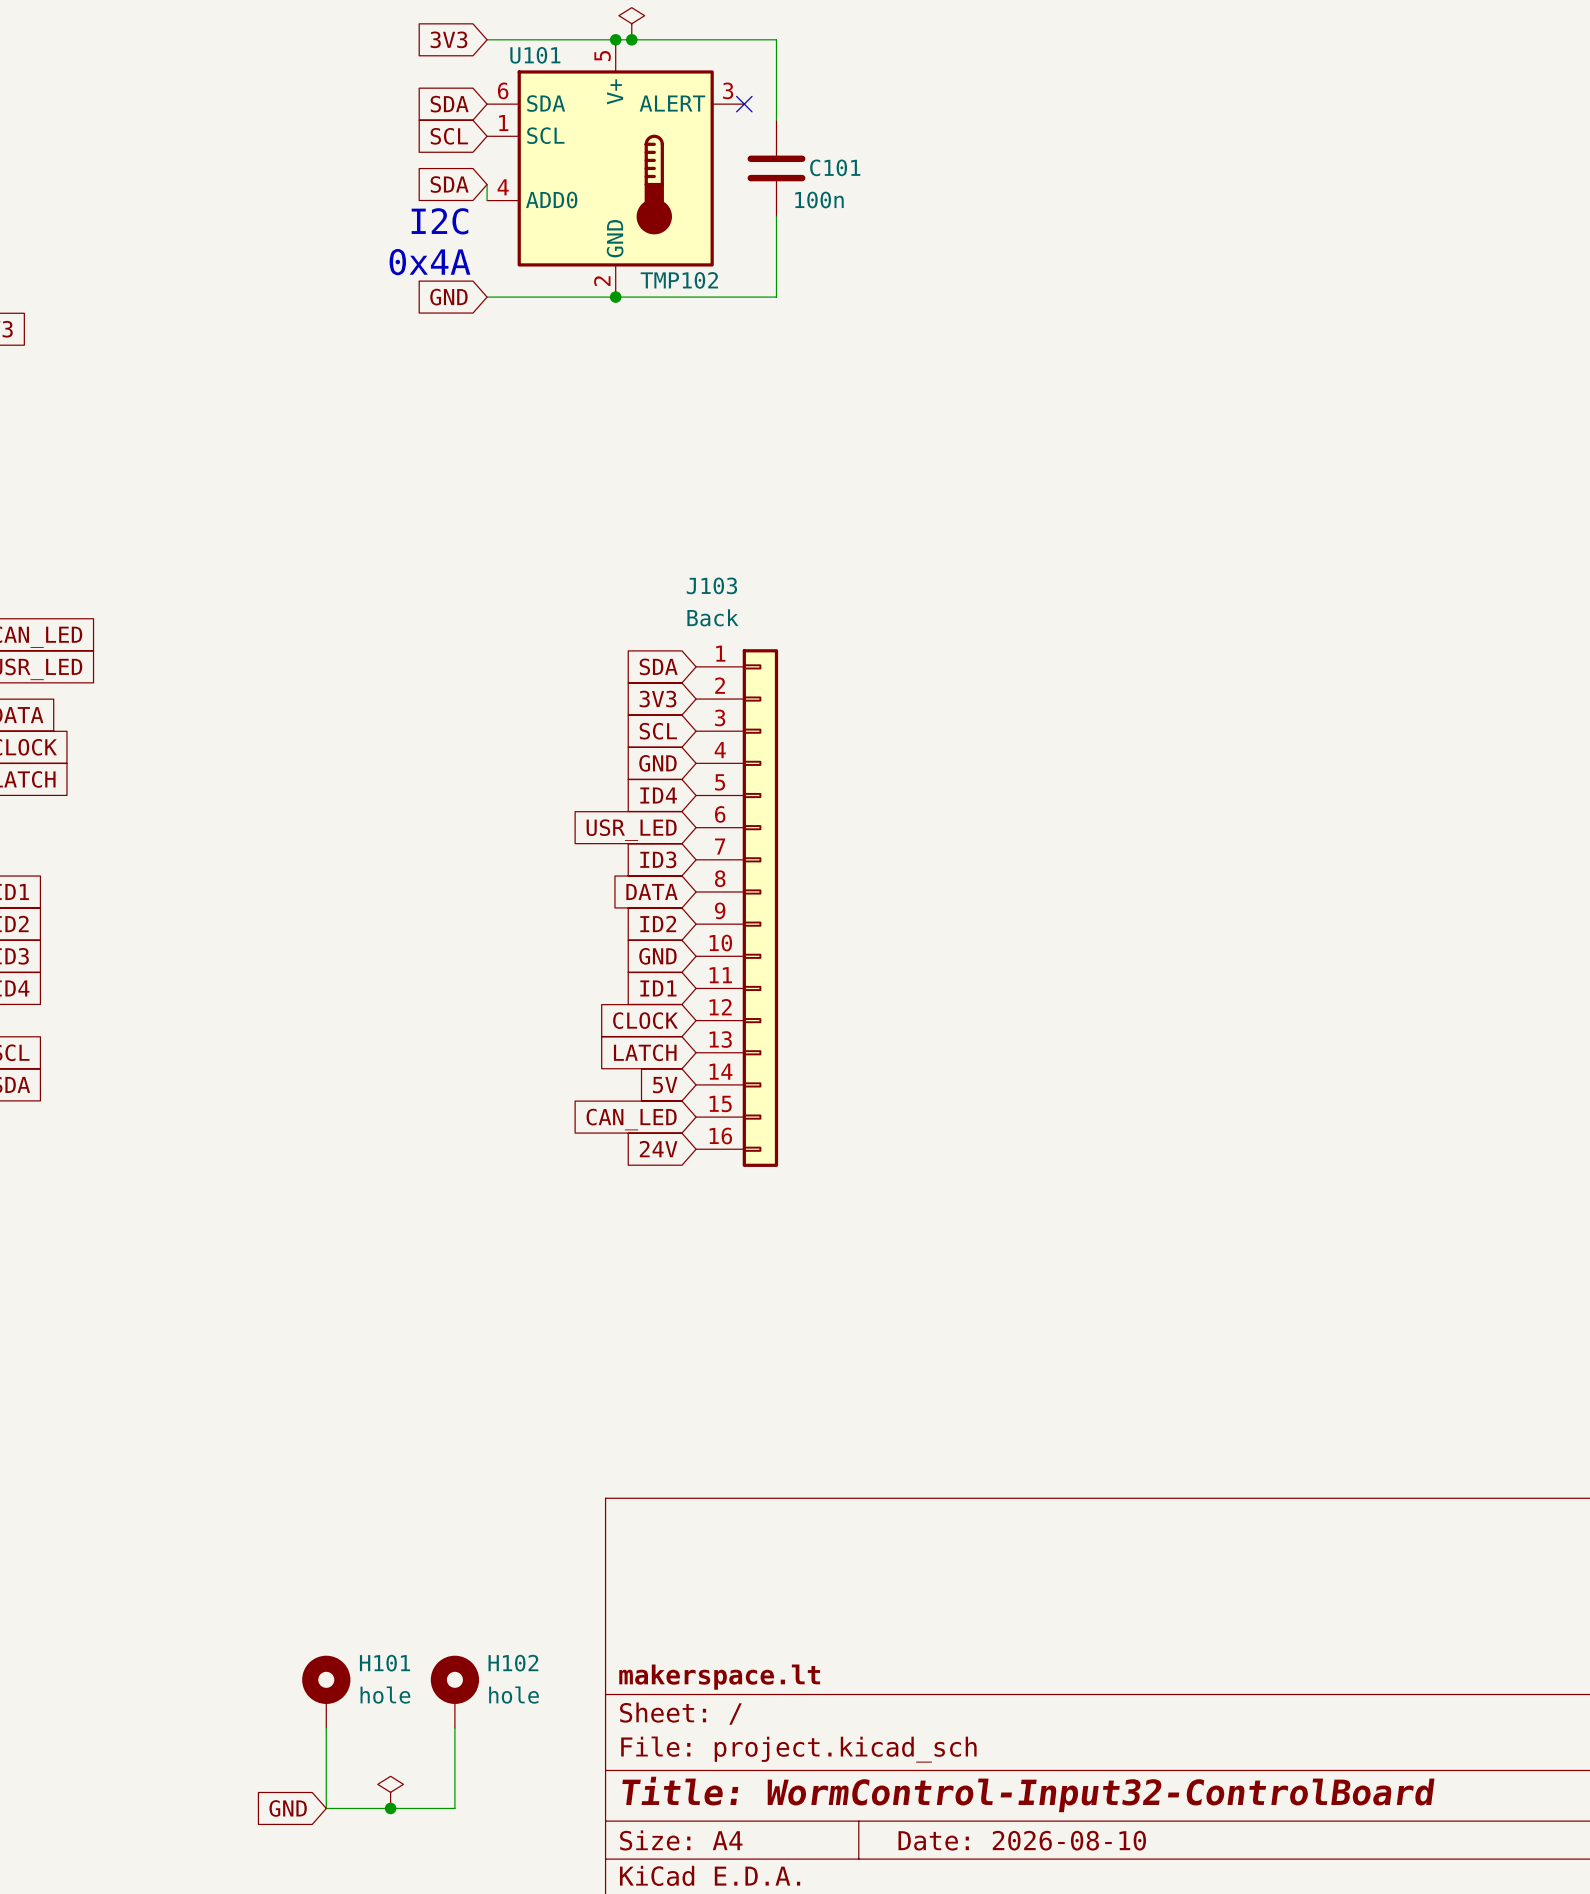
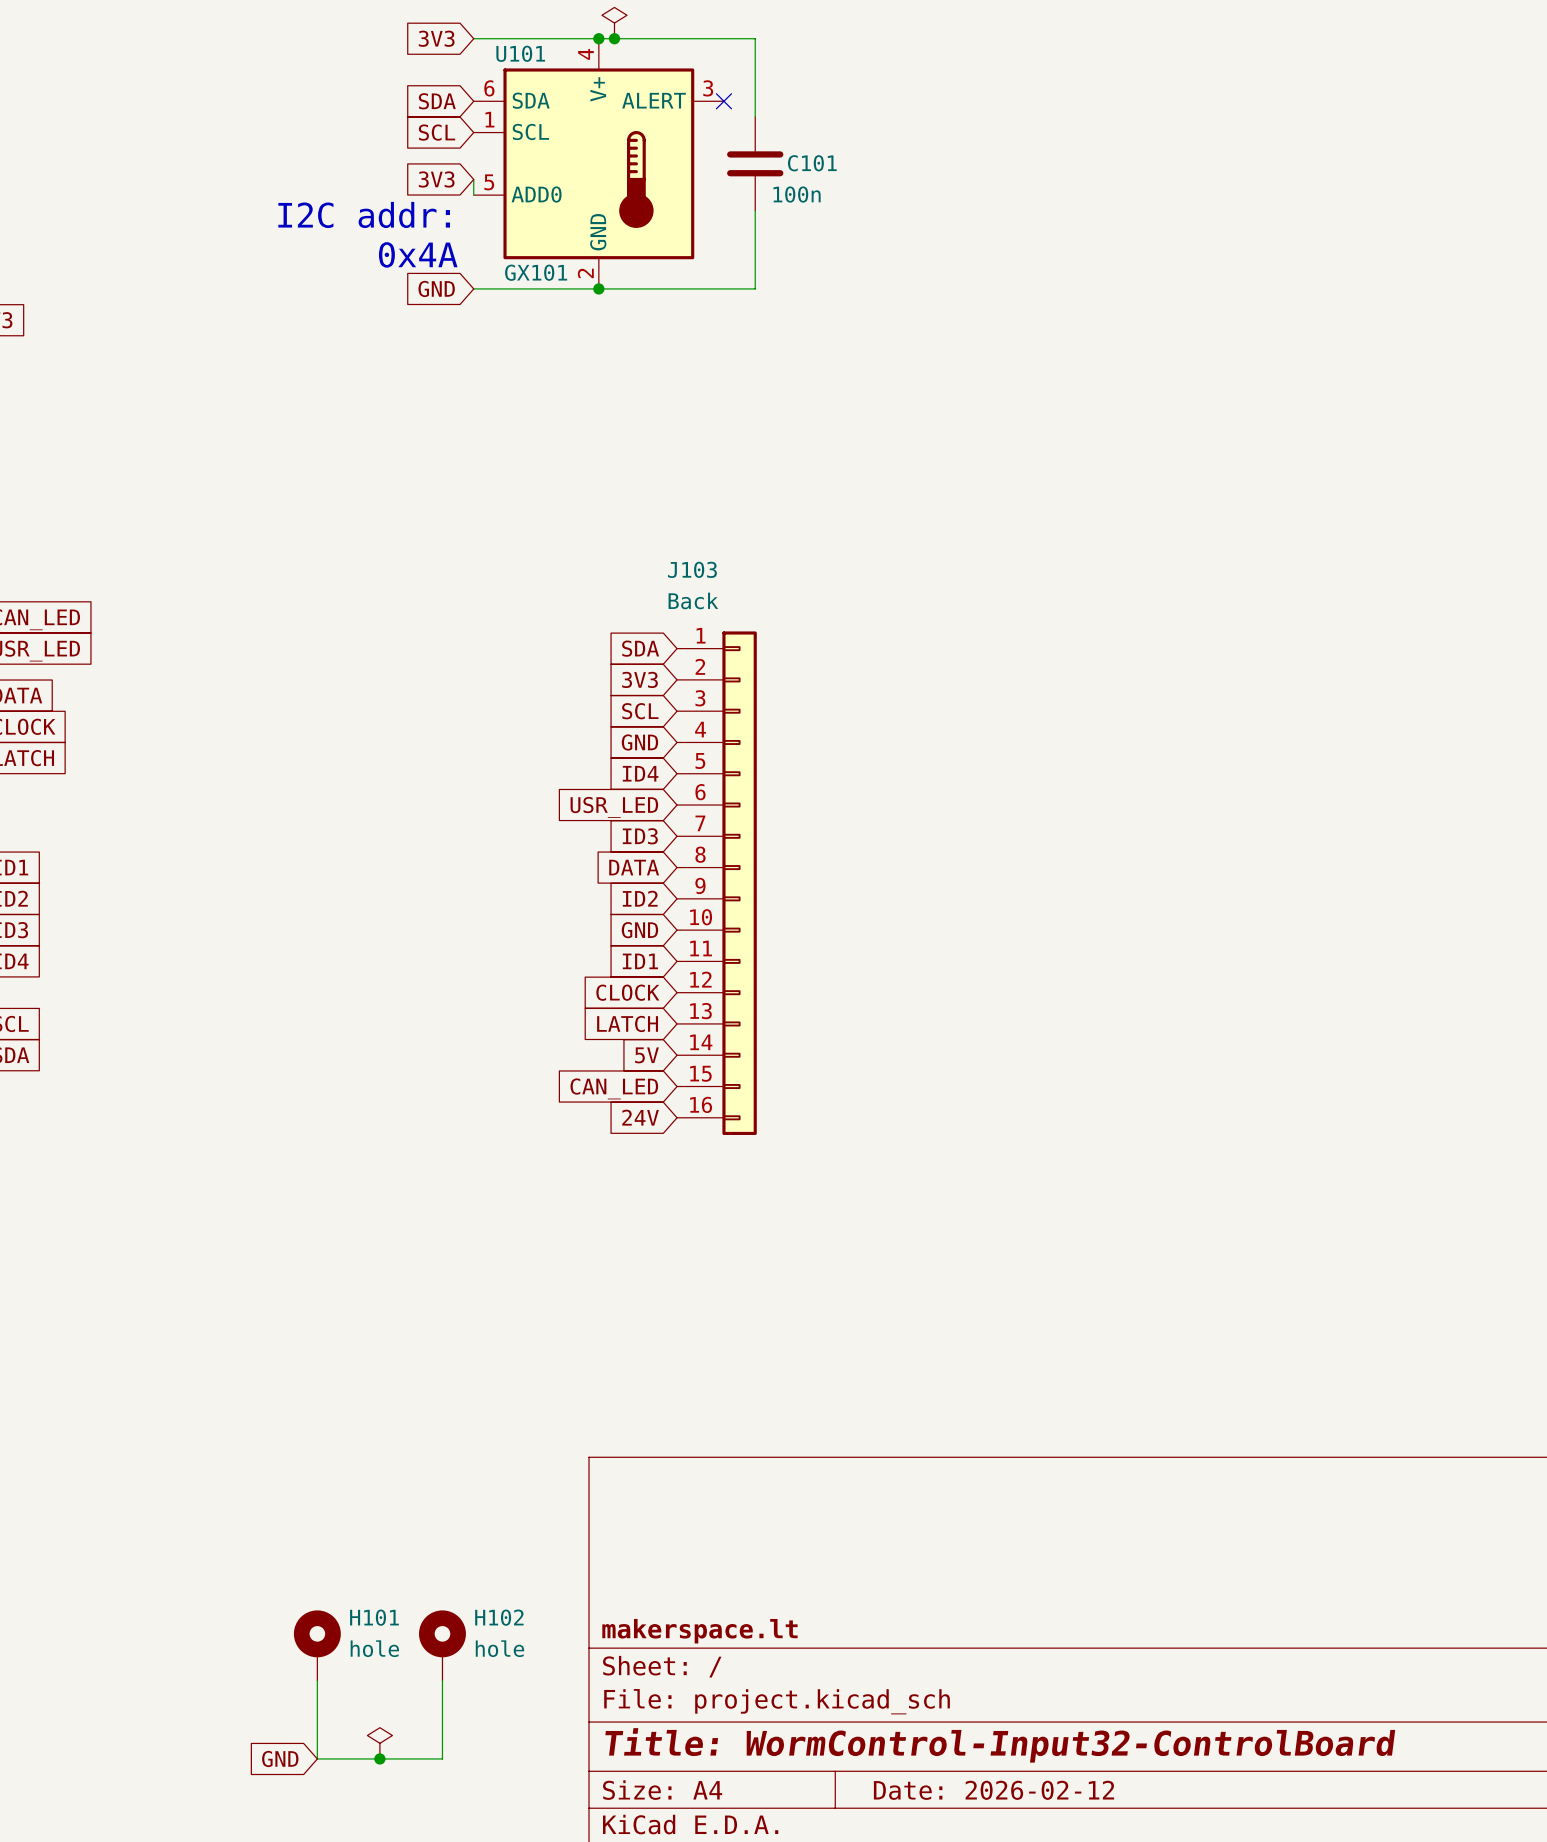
U101 pin number: 5 (602, 56) -> 4 (585, 54)
global label: SDA (449, 184) -> 3V3 (436, 179)
U101 pin number: 4 (503, 187) -> 5 (489, 182)
text: I2C (439, 221) -> I2C addr: (364, 214)
U101 value: TMP102 (679, 280) -> GX101 (536, 272)
title block: Date: 2026-08-10 (1022, 1840) -> Date: 2026-02-12 (994, 1790)

